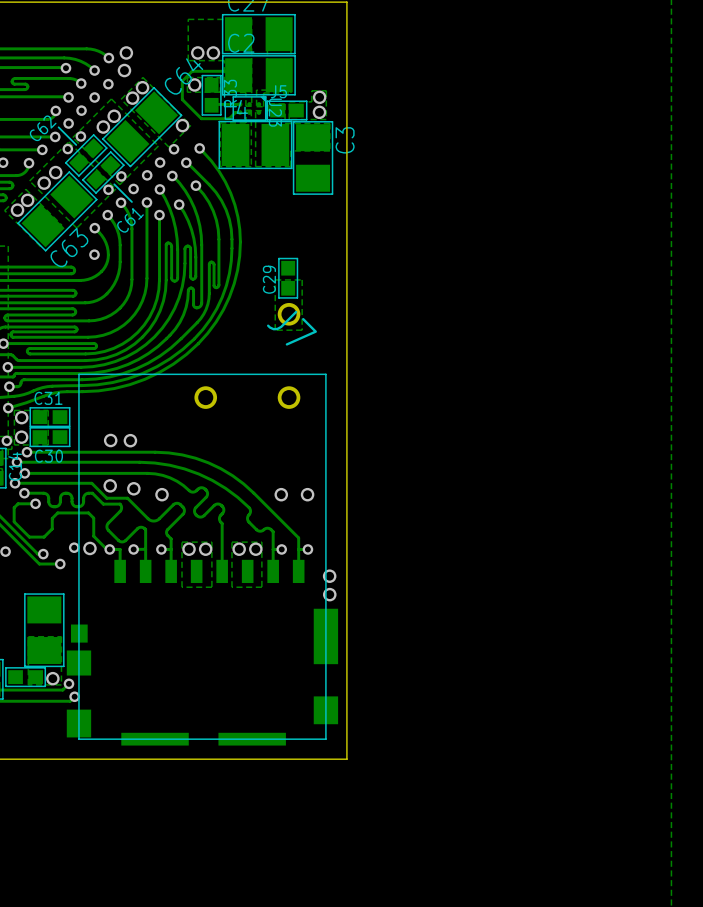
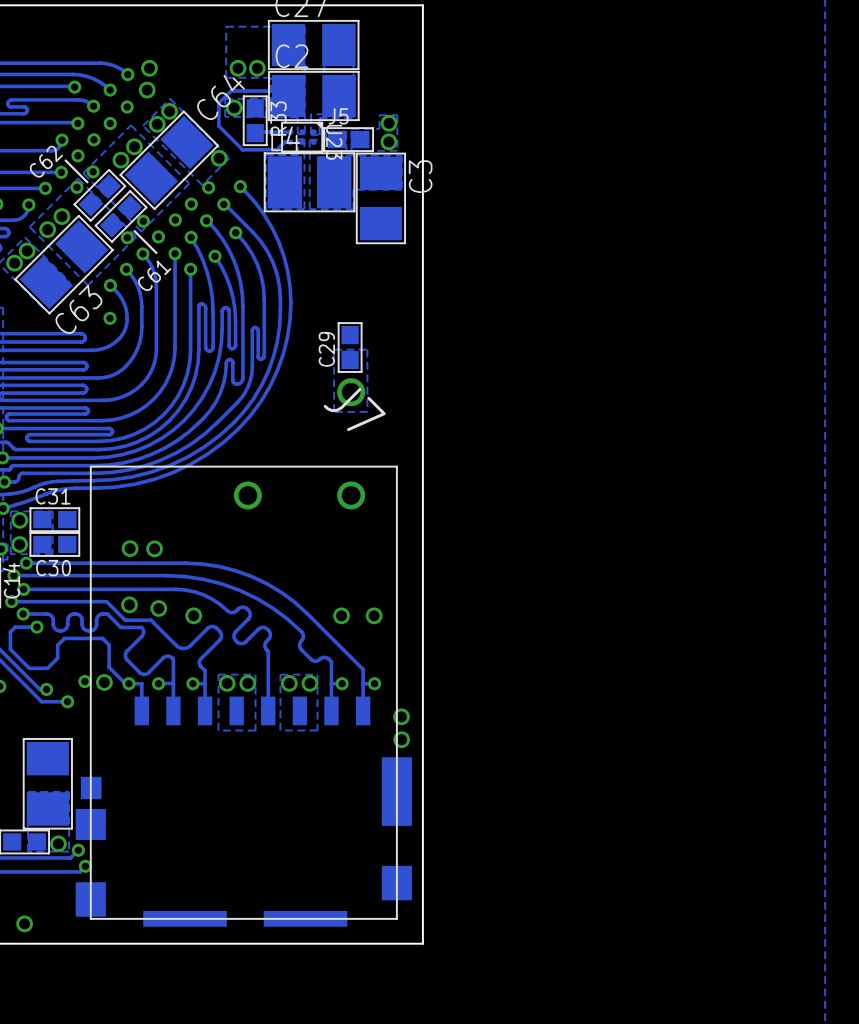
via: none -> (24, 923)

